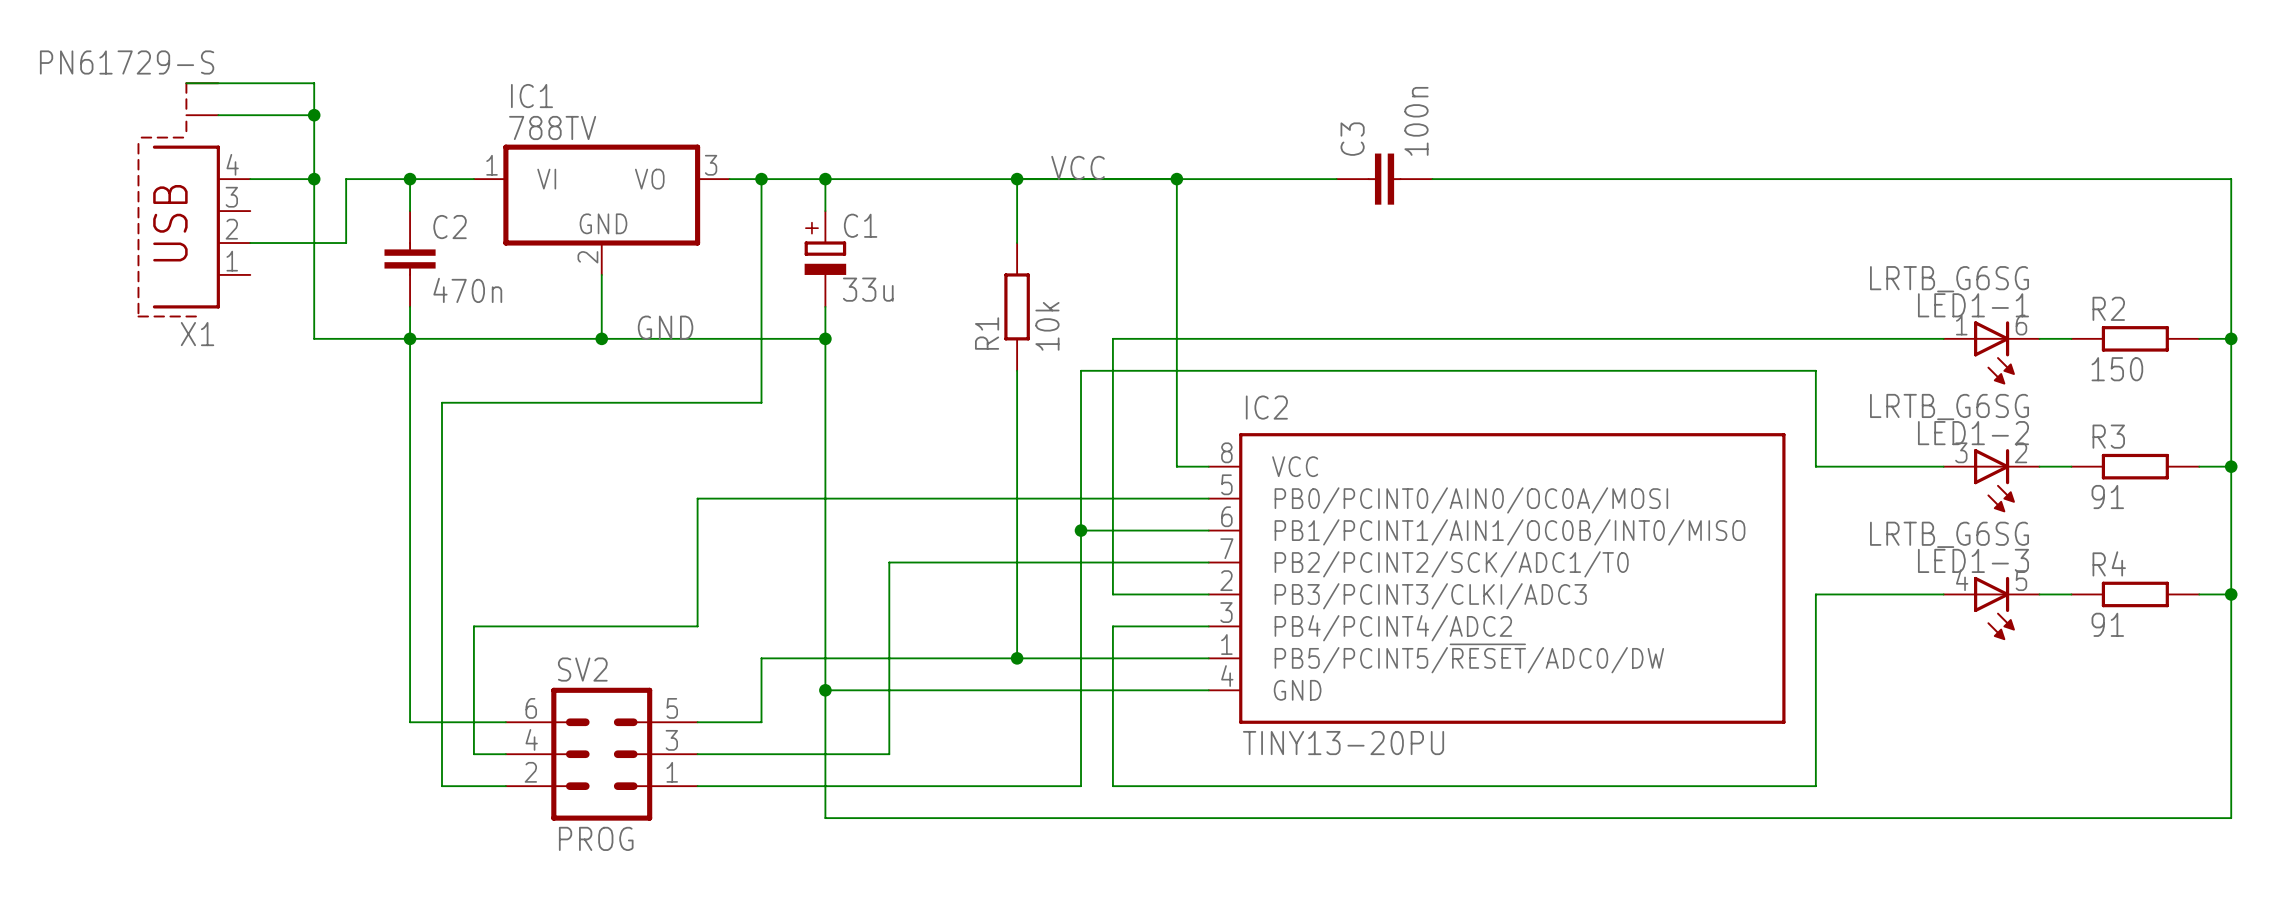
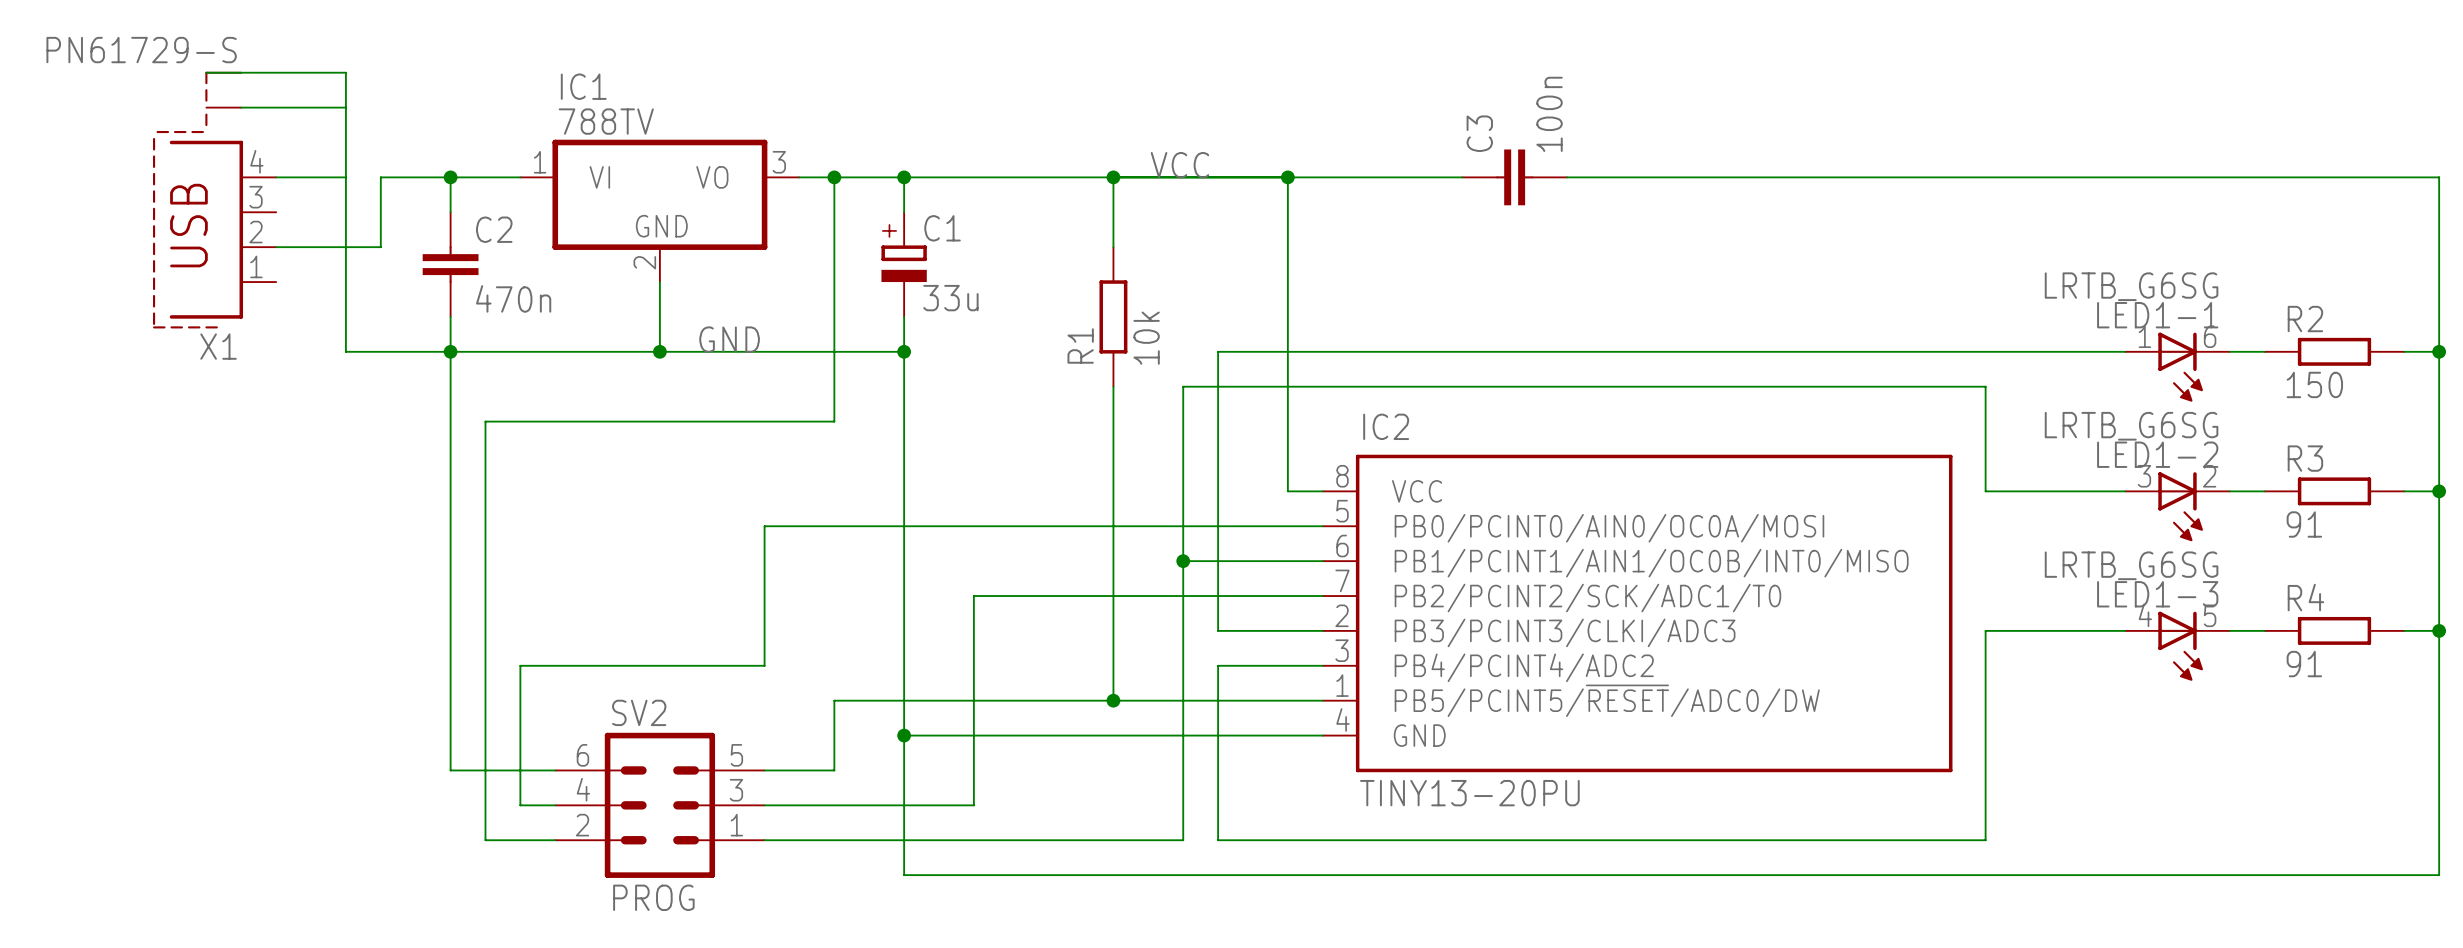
junction: (314, 115) -> none
junction: (314, 179) -> none

